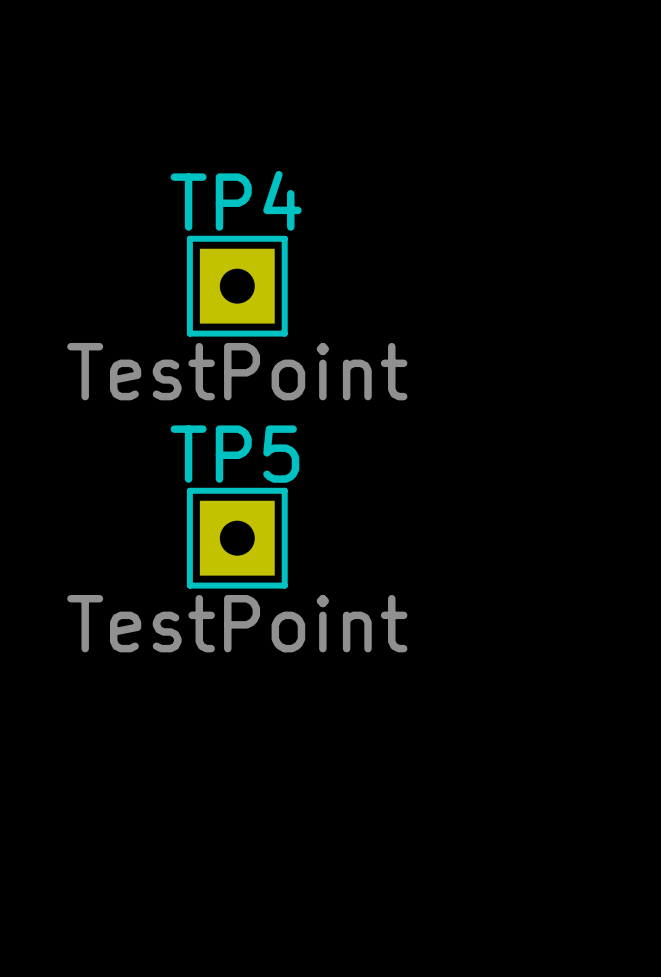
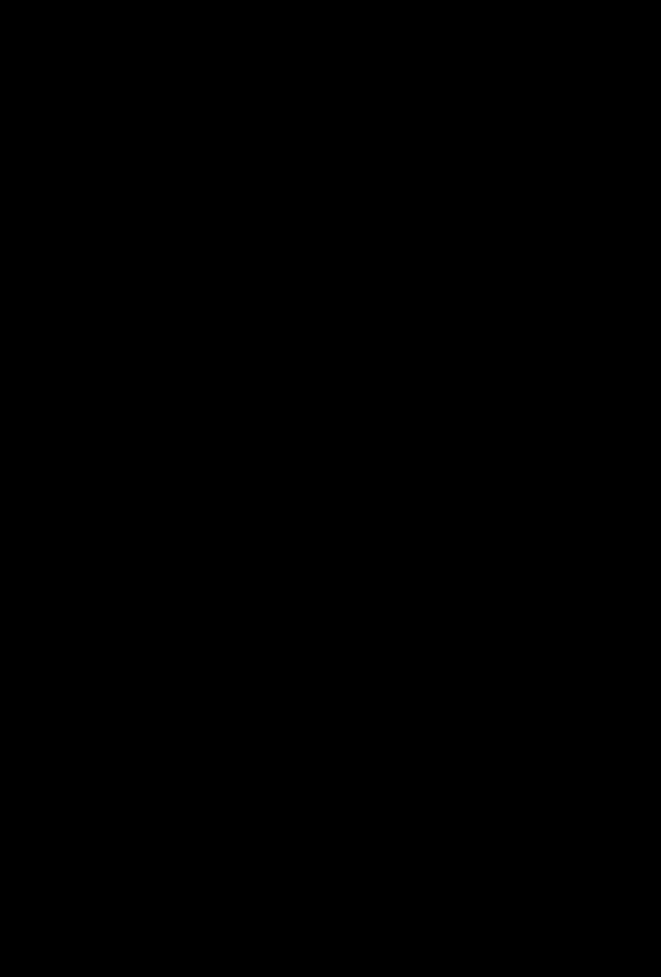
TP4: TestPoint (237, 286) -> none
TP5: TestPoint (237, 538) -> none

